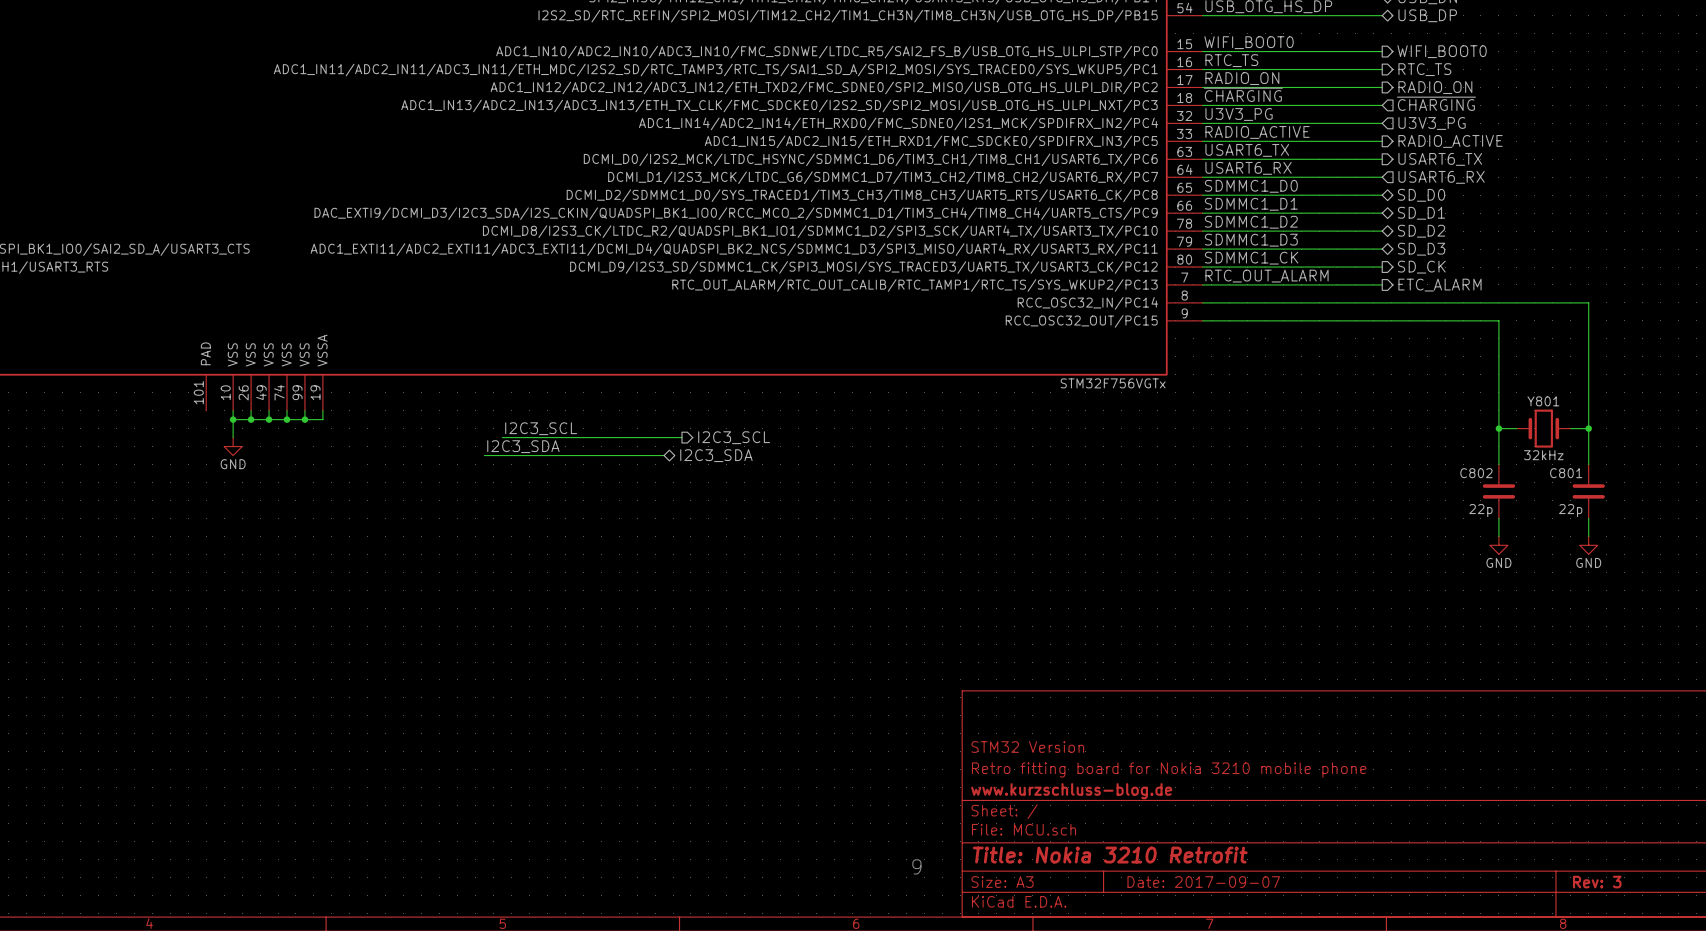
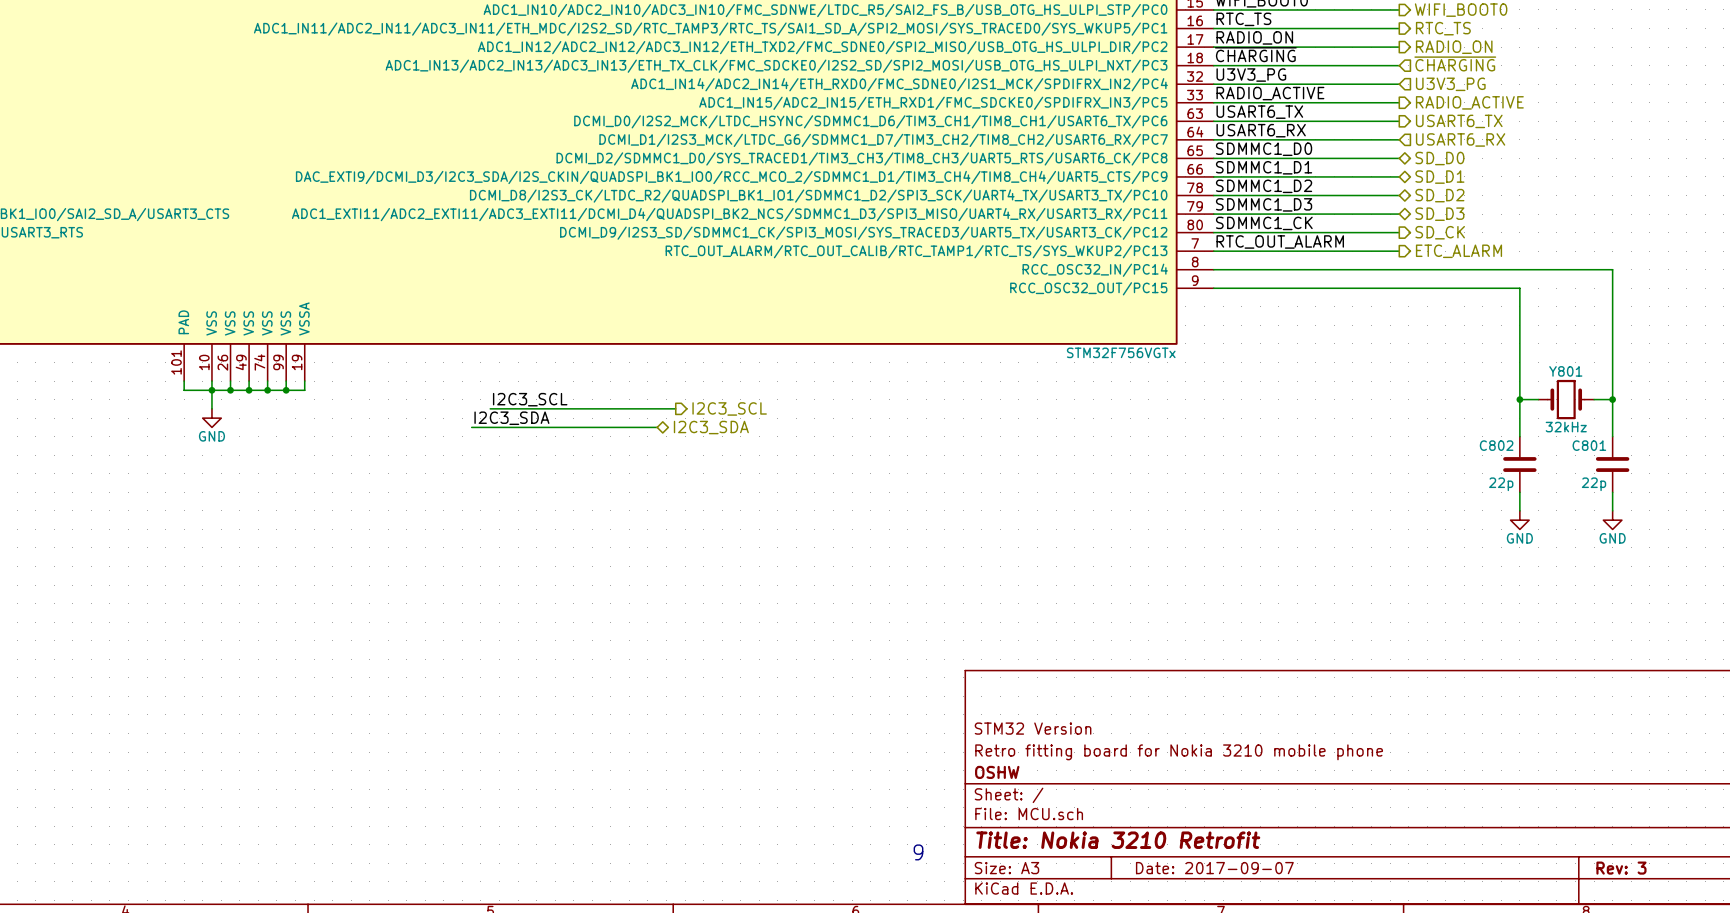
wire: none -> (184, 381) (184, 390) (211, 390)
title block: www.kurzschluss-blog.de (1071, 791) -> OSHW (997, 772)

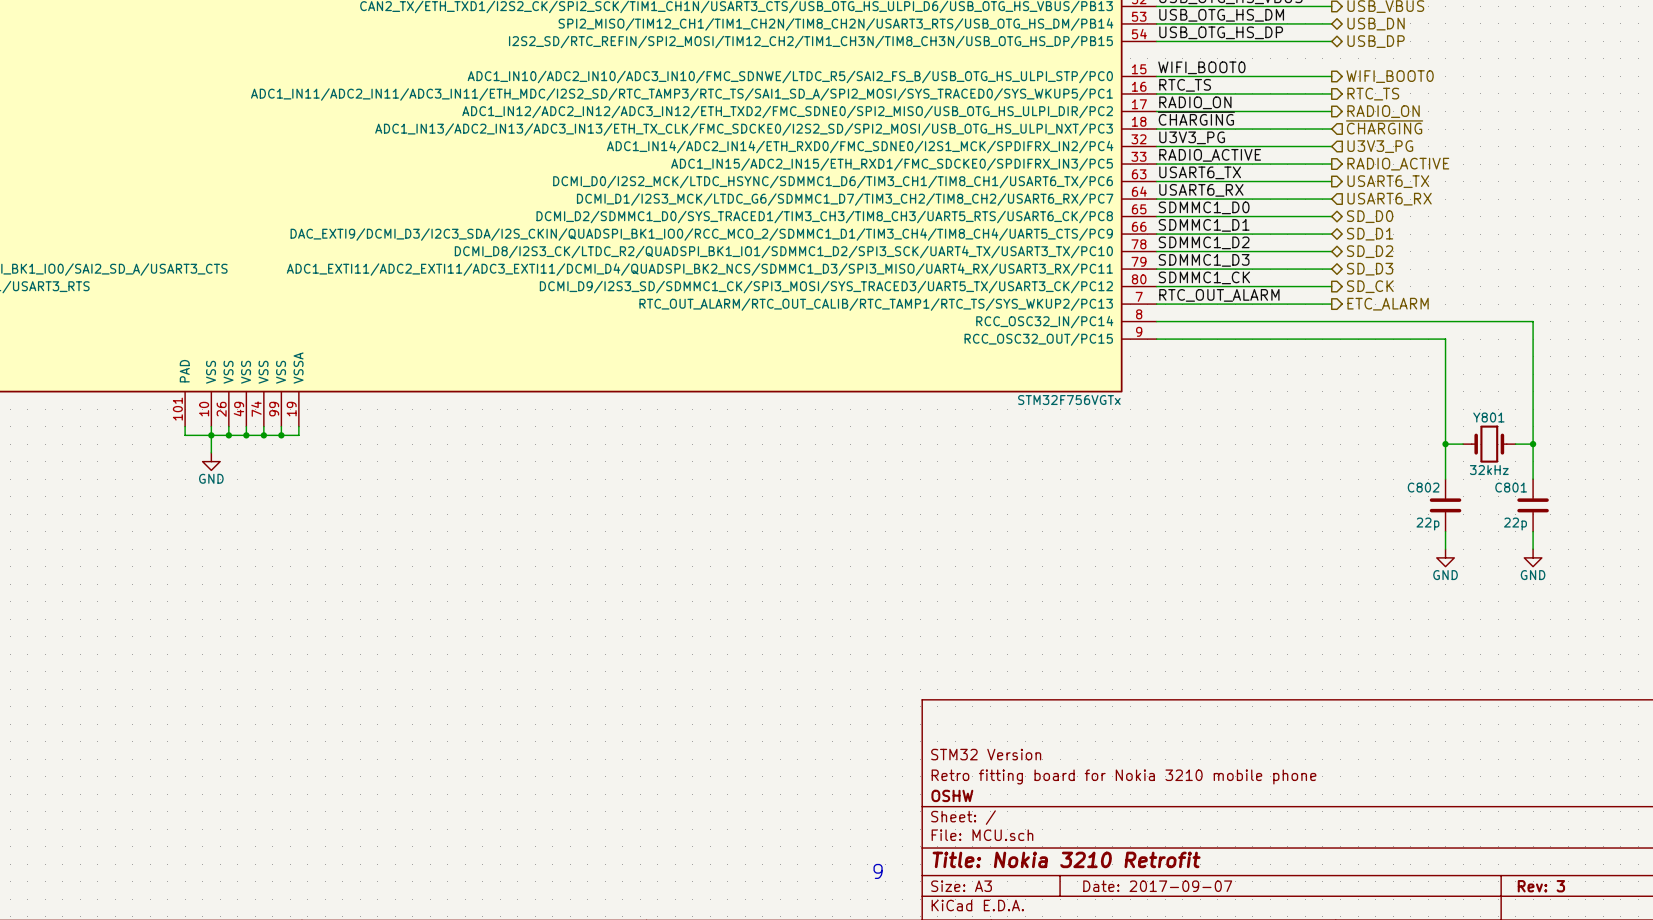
label: I2C3_SCL (530, 399) -> none
wire: (490, 408) (675, 408) -> none
hierarchical label: I2C3_SCL (729, 408) -> none
label: I2C3_SDA (511, 418) -> none
wire: (471, 427) (657, 427) -> none
hierarchical label: I2C3_SDA (711, 427) -> none

